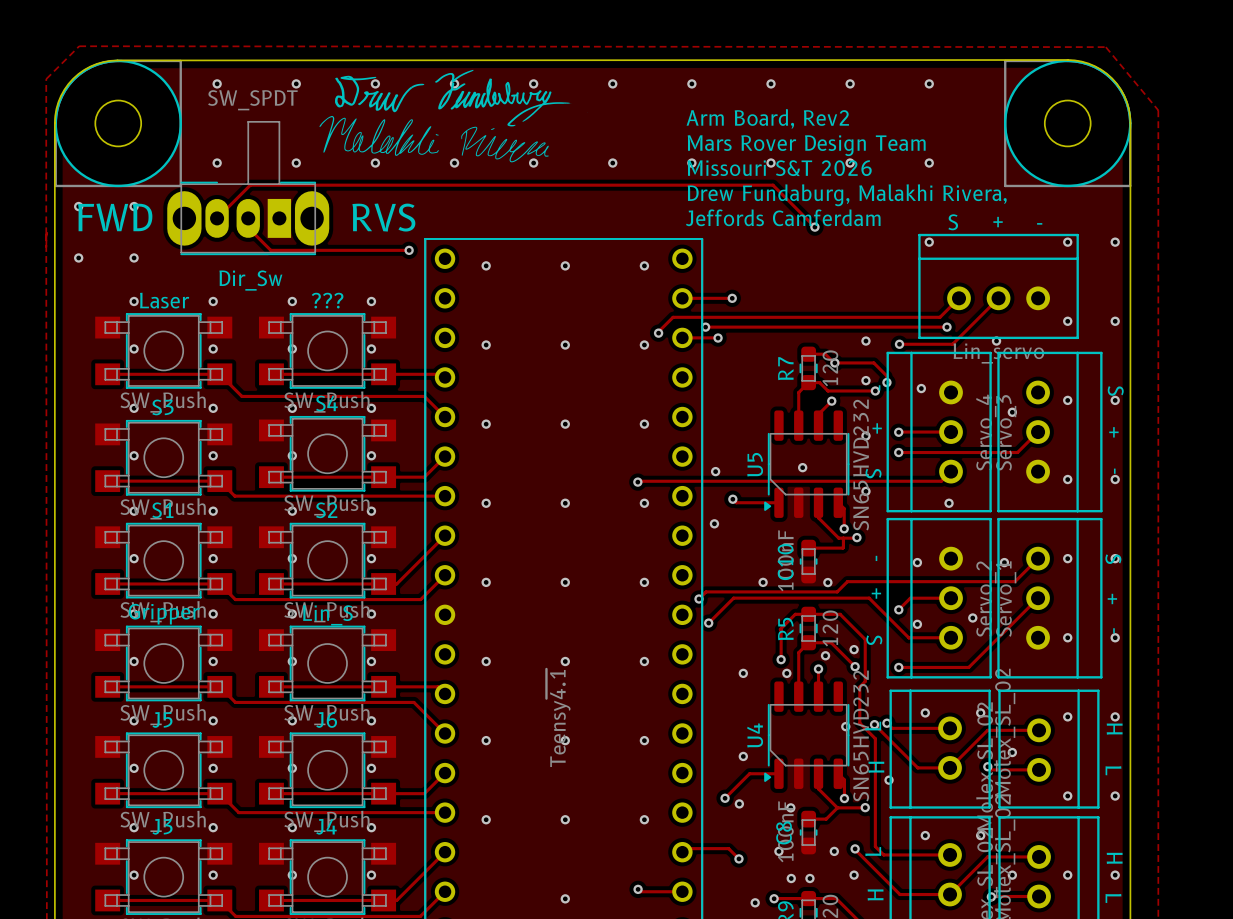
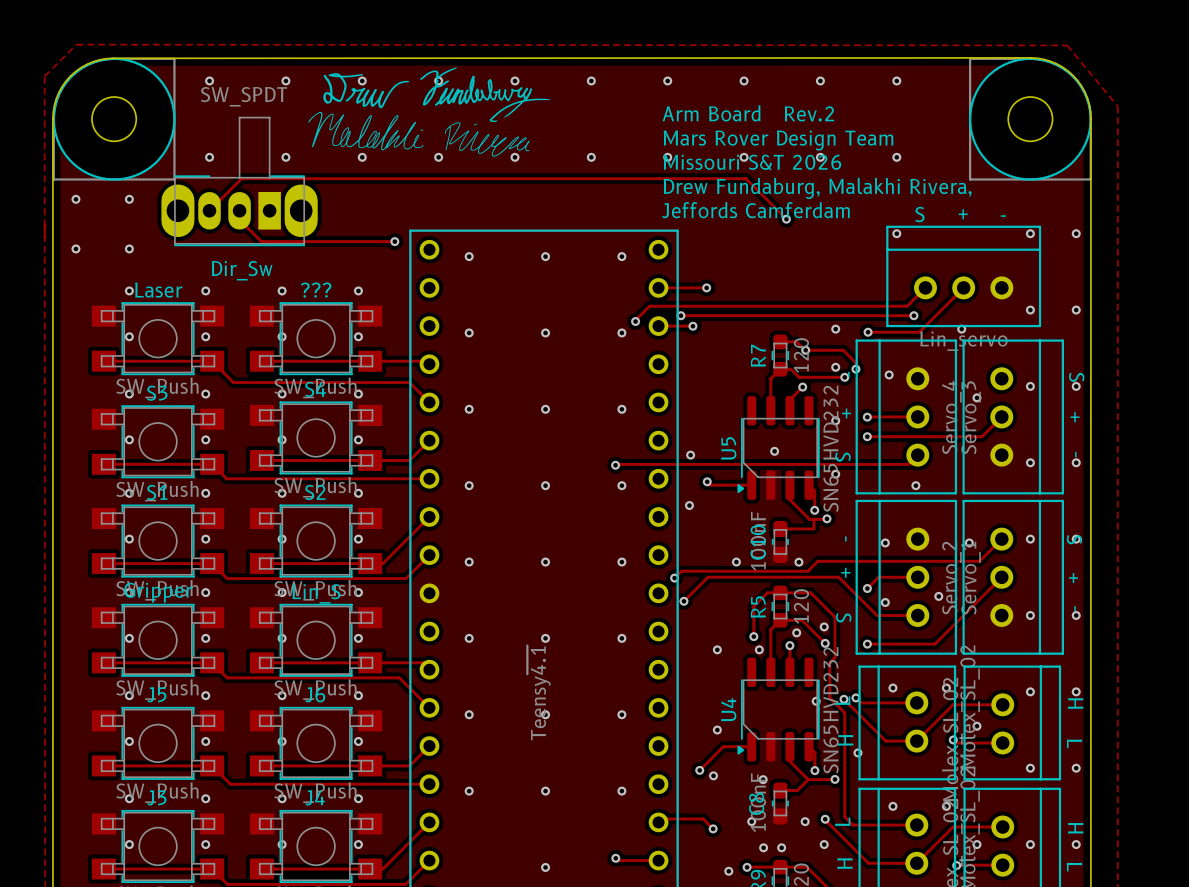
text: Arm Board, Rev2 (767, 118) -> Arm Board Rev.2 (748, 113)
text: FWD (115, 217) -> none
text: RVS (383, 217) -> none

